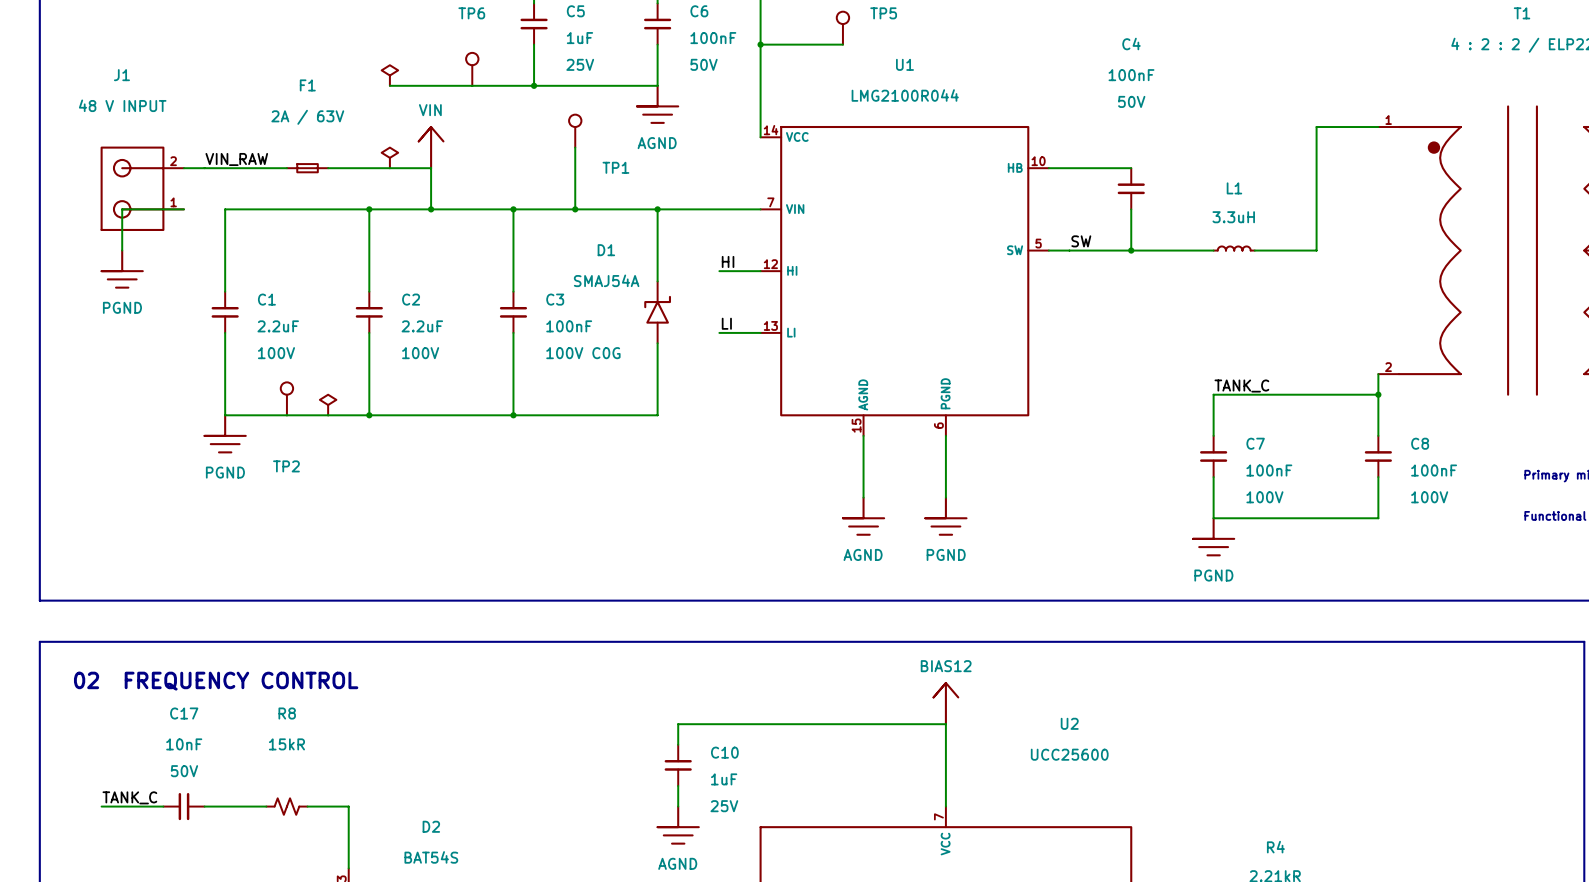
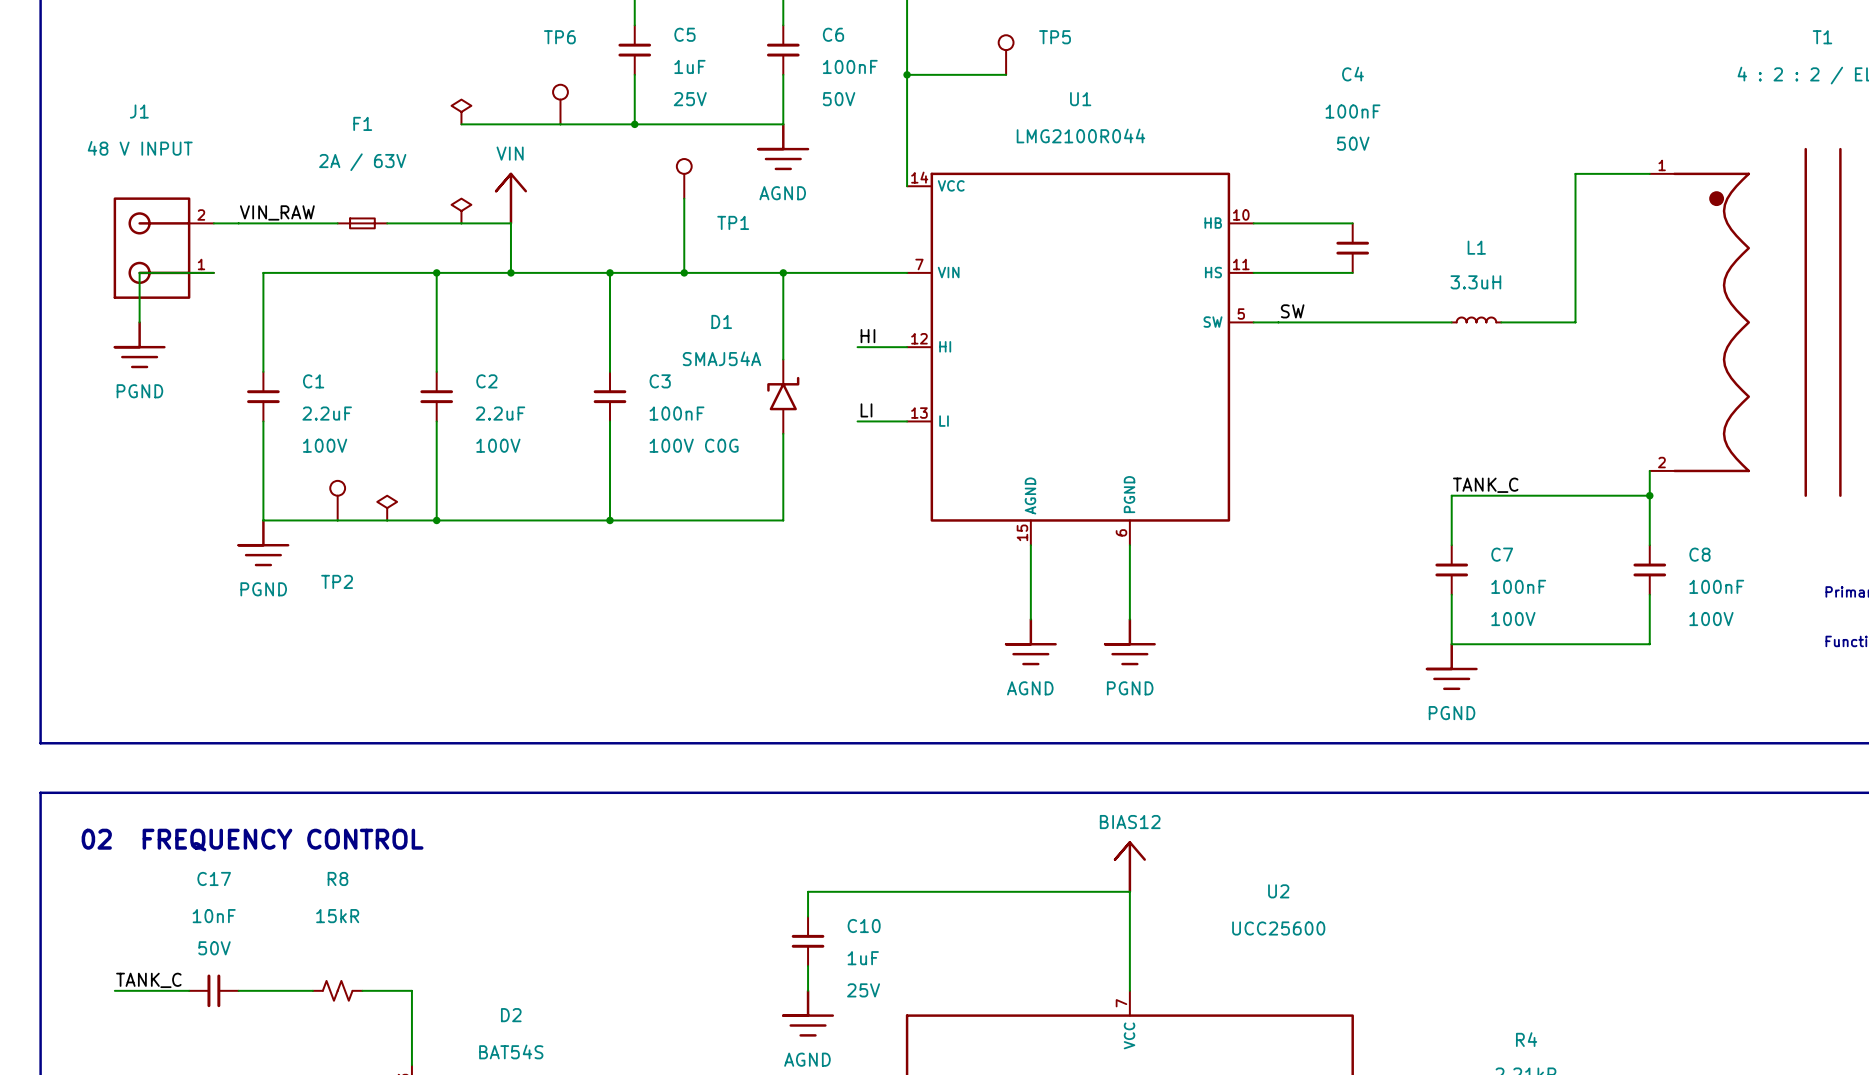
U1 symbol: [760, 125, 1049, 436] -> [907, 172, 1254, 546]
wire: (1131, 209) (1131, 250) -> (1352, 272) (1253, 272)
junction: (1131, 250) -> none

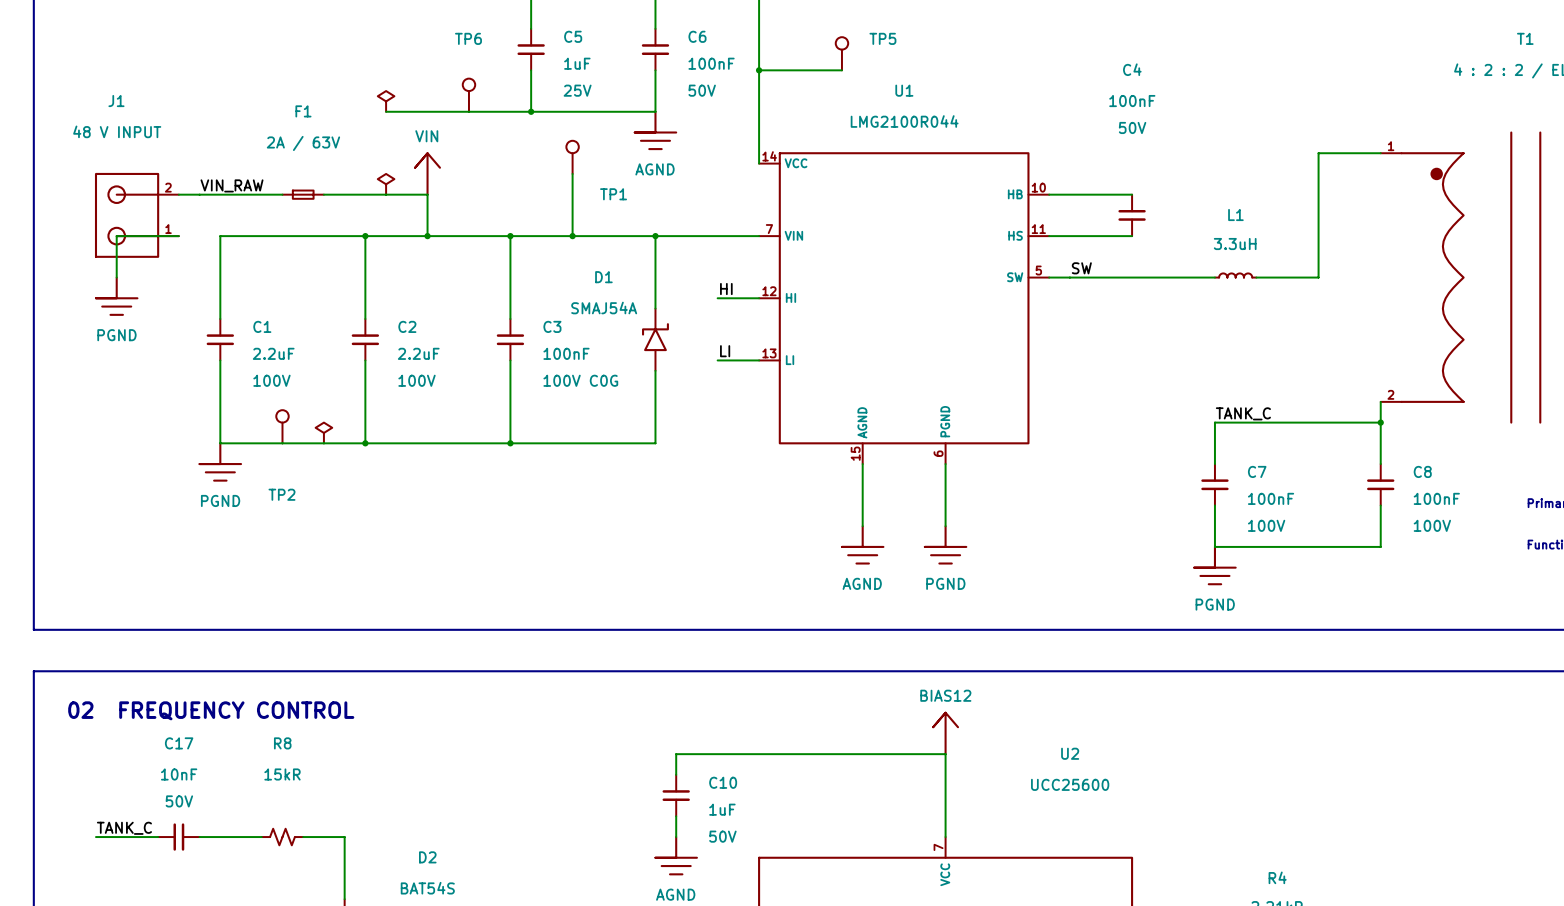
C10 text: 25V (863, 990) -> 50V (722, 836)

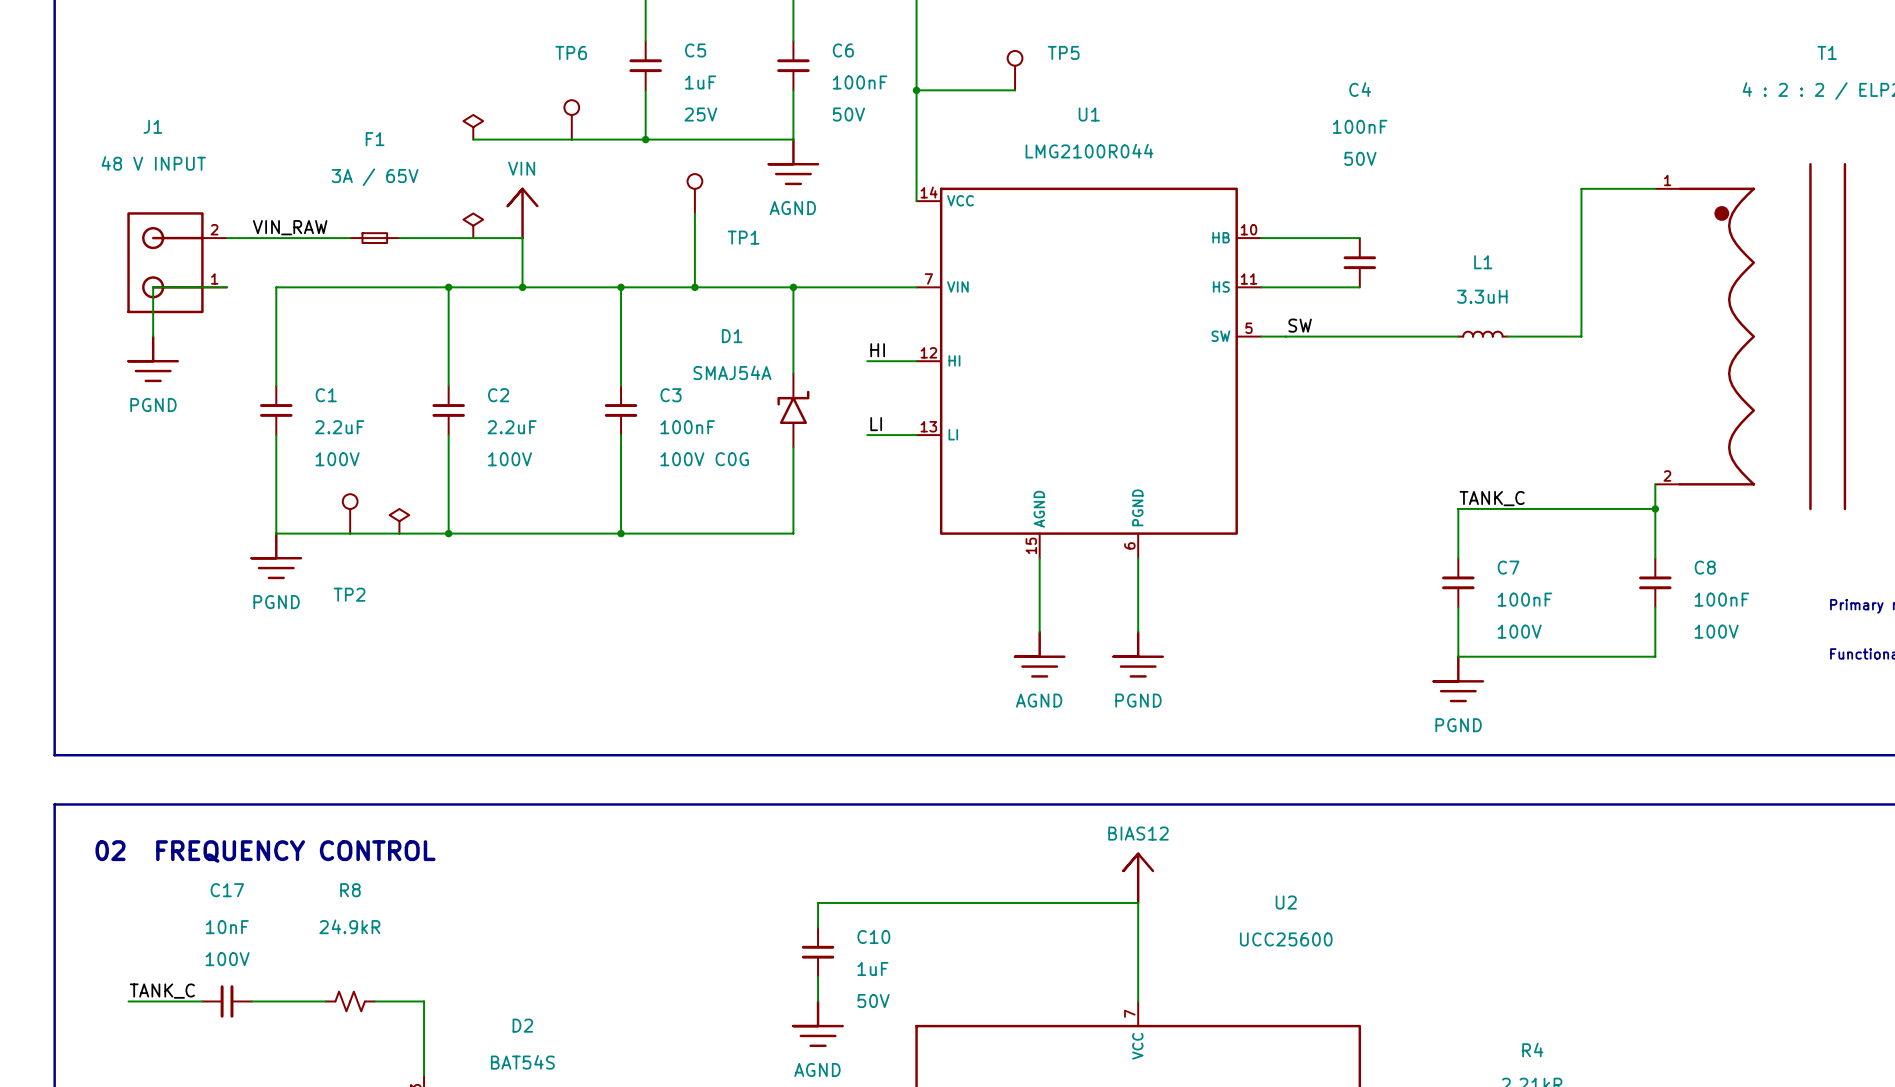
F1 value: 2A / 63V (303, 143) -> 3A / 65V (375, 177)
R8 value: 15kR (282, 774) -> 24.9kR (349, 926)
C17 text: 50V (179, 801) -> 100V (227, 959)

